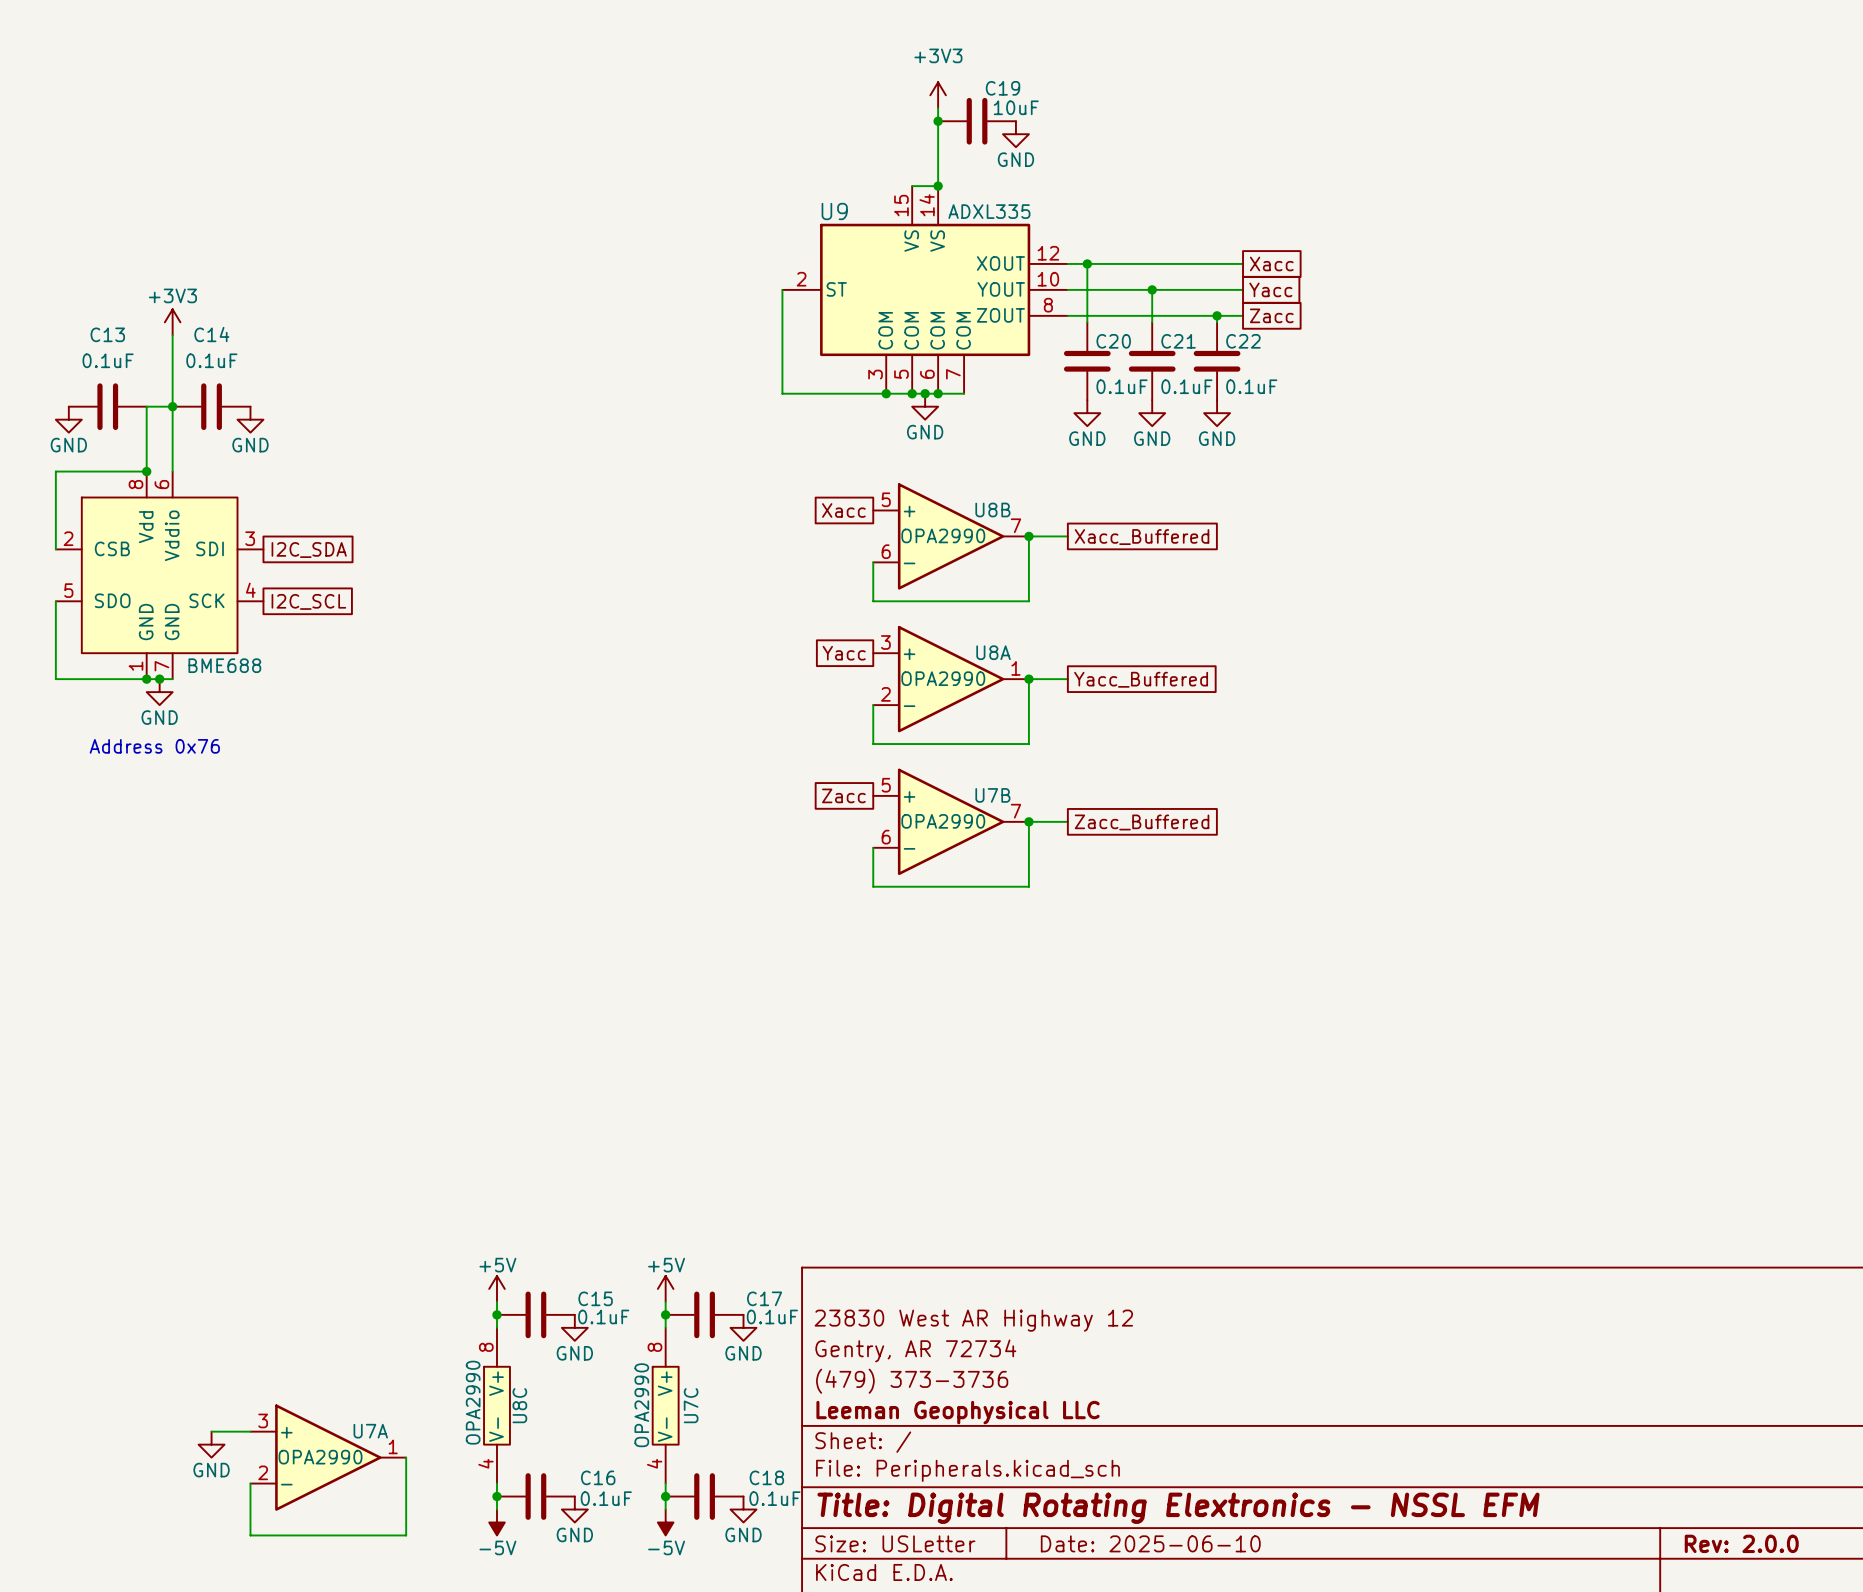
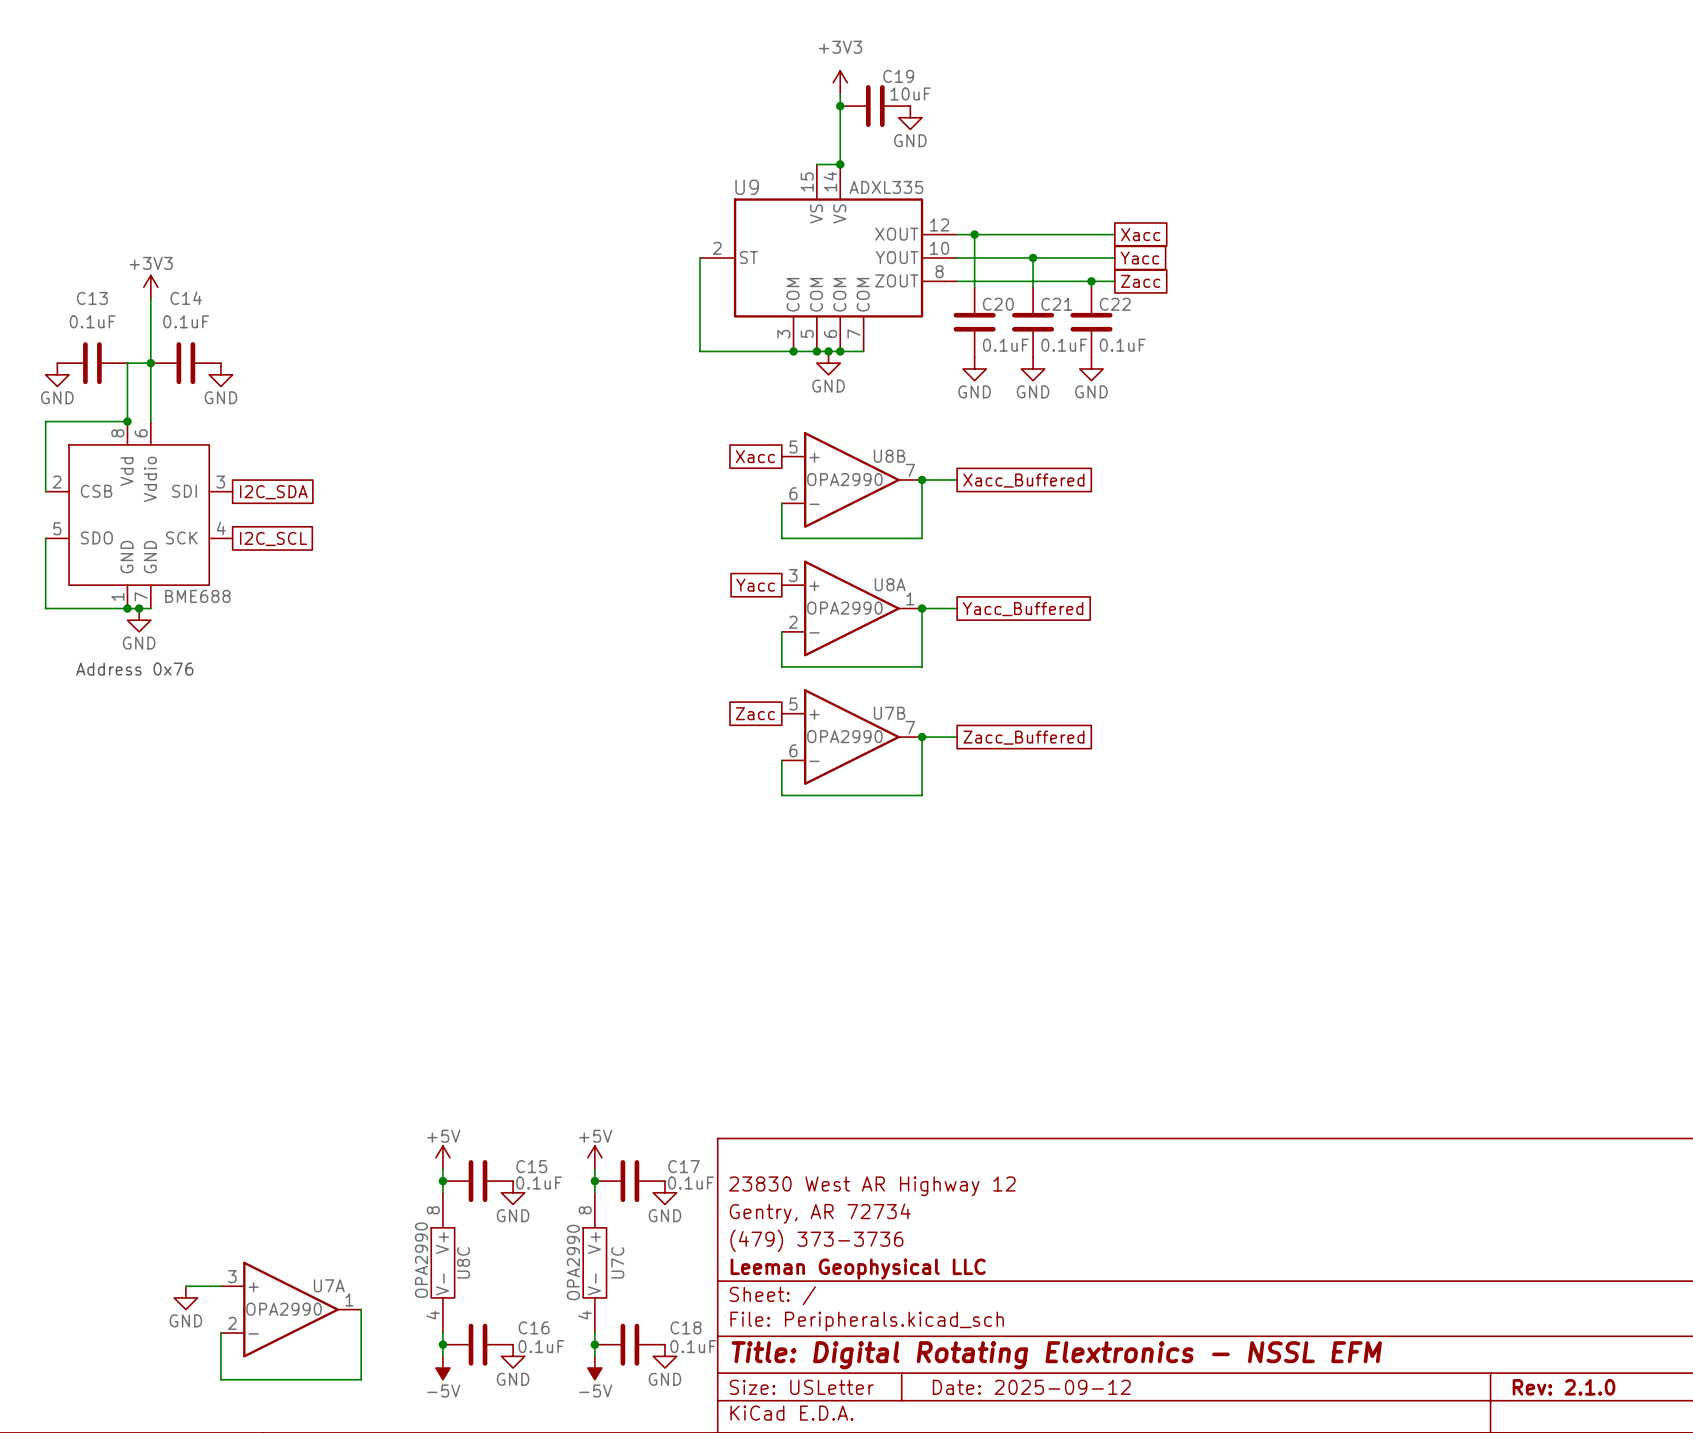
title block: Date: 2025-06-10 (1150, 1543) -> Date: 2025-09-12 (1031, 1387)
title block: Rev: 2.0.0 (1741, 1543) -> Rev: 2.1.0 (1564, 1387)

